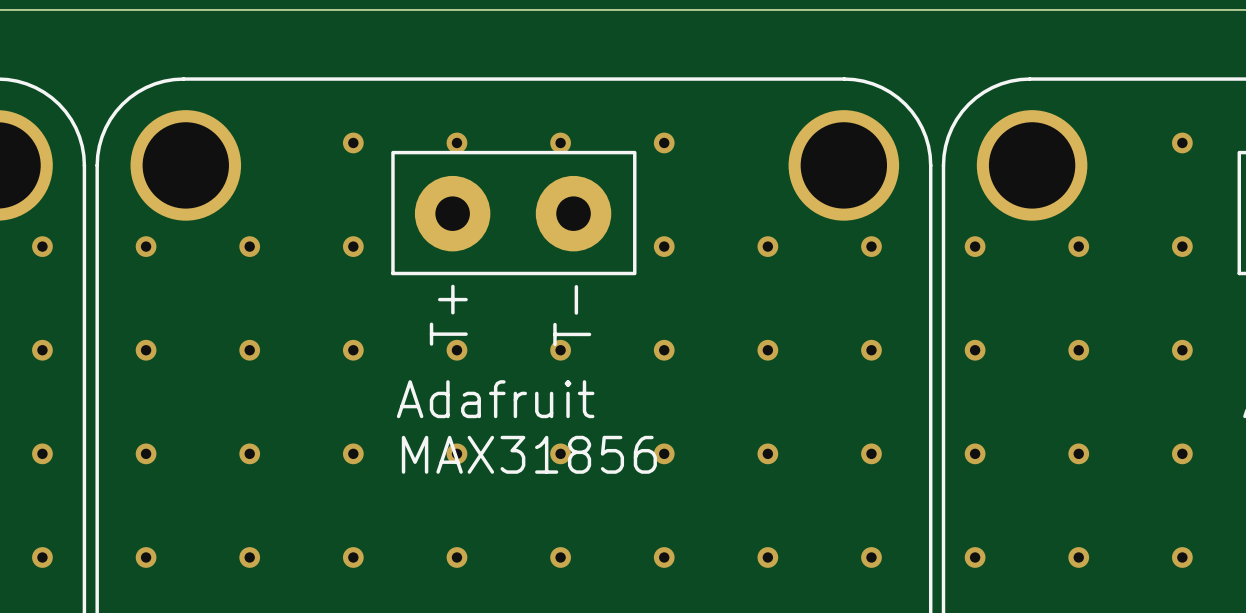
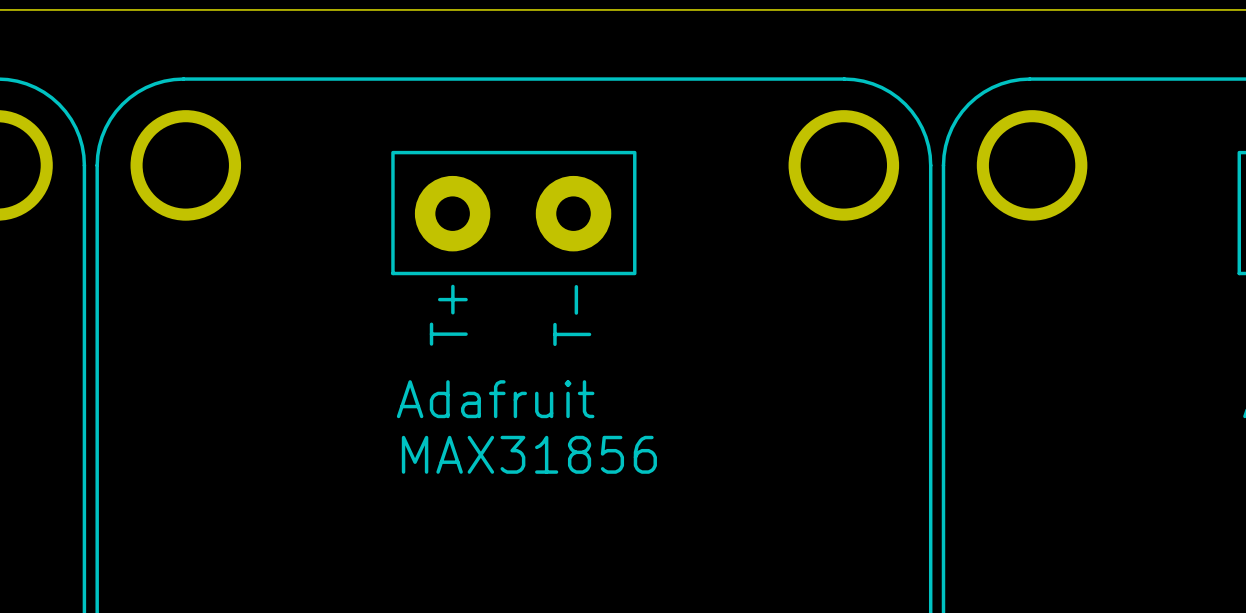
via: (353, 142) -> none
via: (456, 142) -> none
via: (560, 142) -> none
via: (664, 142) -> none
via: (1182, 142) -> none
via: (42, 246) -> none
via: (146, 246) -> none
via: (249, 246) -> none
via: (353, 246) -> none
via: (664, 246) -> none
via: (767, 246) -> none
via: (871, 246) -> none
via: (975, 246) -> none
via: (1078, 246) -> none
via: (1182, 246) -> none
via: (42, 350) -> none
via: (146, 350) -> none
via: (249, 350) -> none
via: (353, 350) -> none
via: (456, 350) -> none
via: (560, 350) -> none
via: (664, 350) -> none
via: (767, 350) -> none
via: (871, 350) -> none
via: (975, 350) -> none
via: (1078, 350) -> none
via: (1182, 350) -> none
via: (42, 453) -> none
via: (146, 453) -> none
via: (249, 453) -> none
via: (353, 453) -> none
via: (456, 453) -> none
via: (560, 453) -> none
via: (664, 453) -> none
via: (767, 453) -> none
via: (871, 453) -> none
via: (975, 453) -> none
via: (1078, 453) -> none
via: (1182, 453) -> none
via: (42, 557) -> none
via: (146, 557) -> none
via: (249, 557) -> none
via: (353, 557) -> none
via: (456, 557) -> none
via: (560, 557) -> none
via: (664, 557) -> none
via: (767, 557) -> none
via: (871, 557) -> none
via: (975, 557) -> none
via: (1078, 557) -> none
via: (1182, 557) -> none

